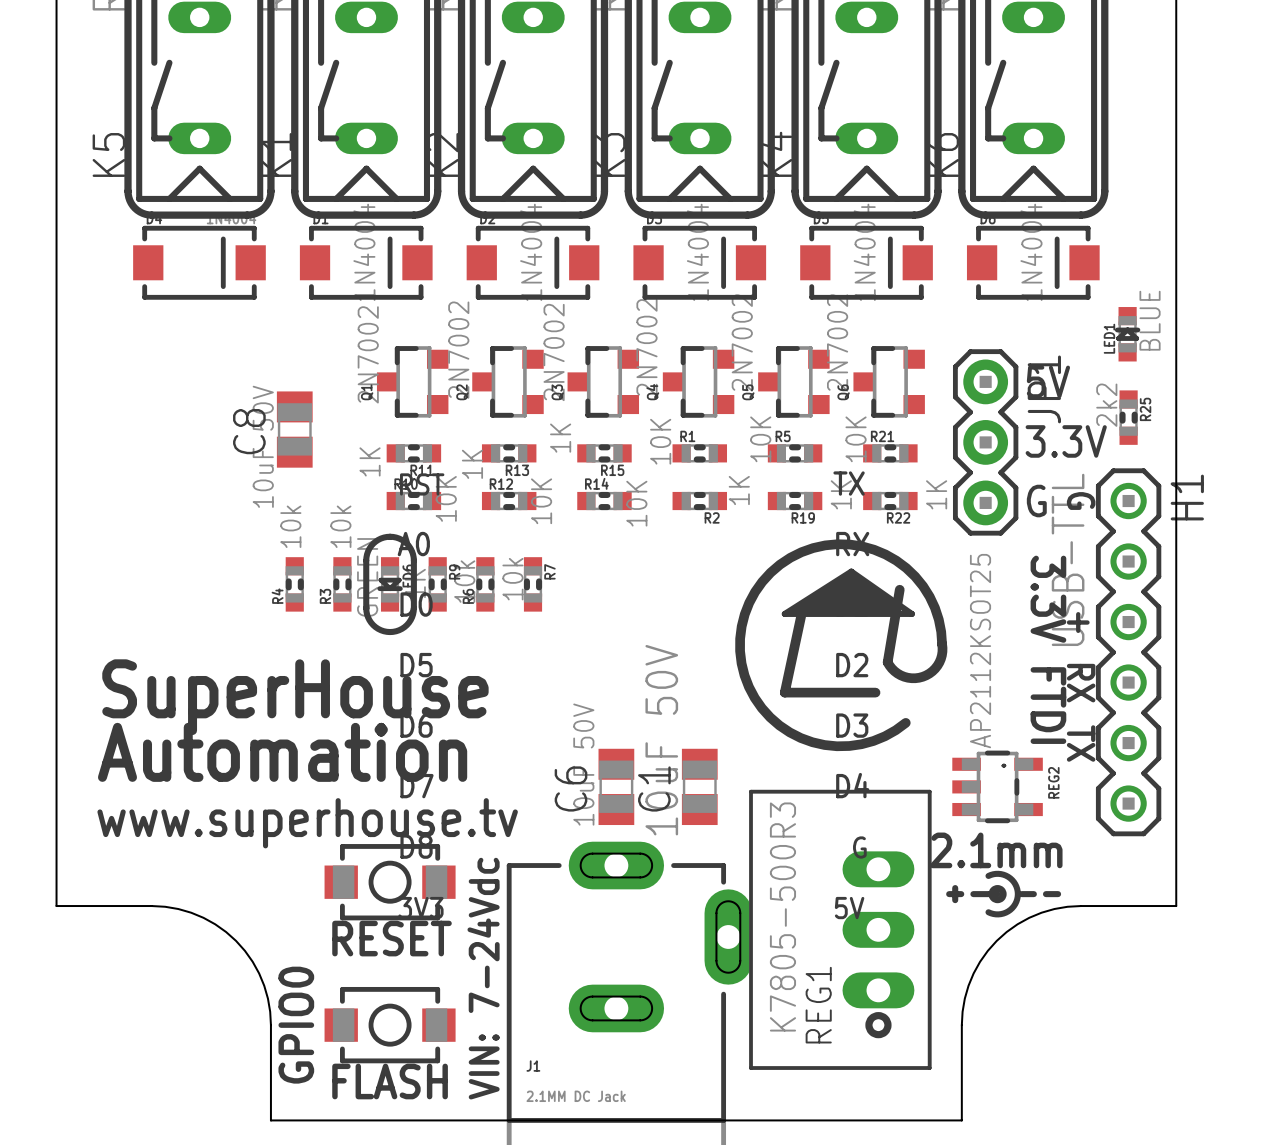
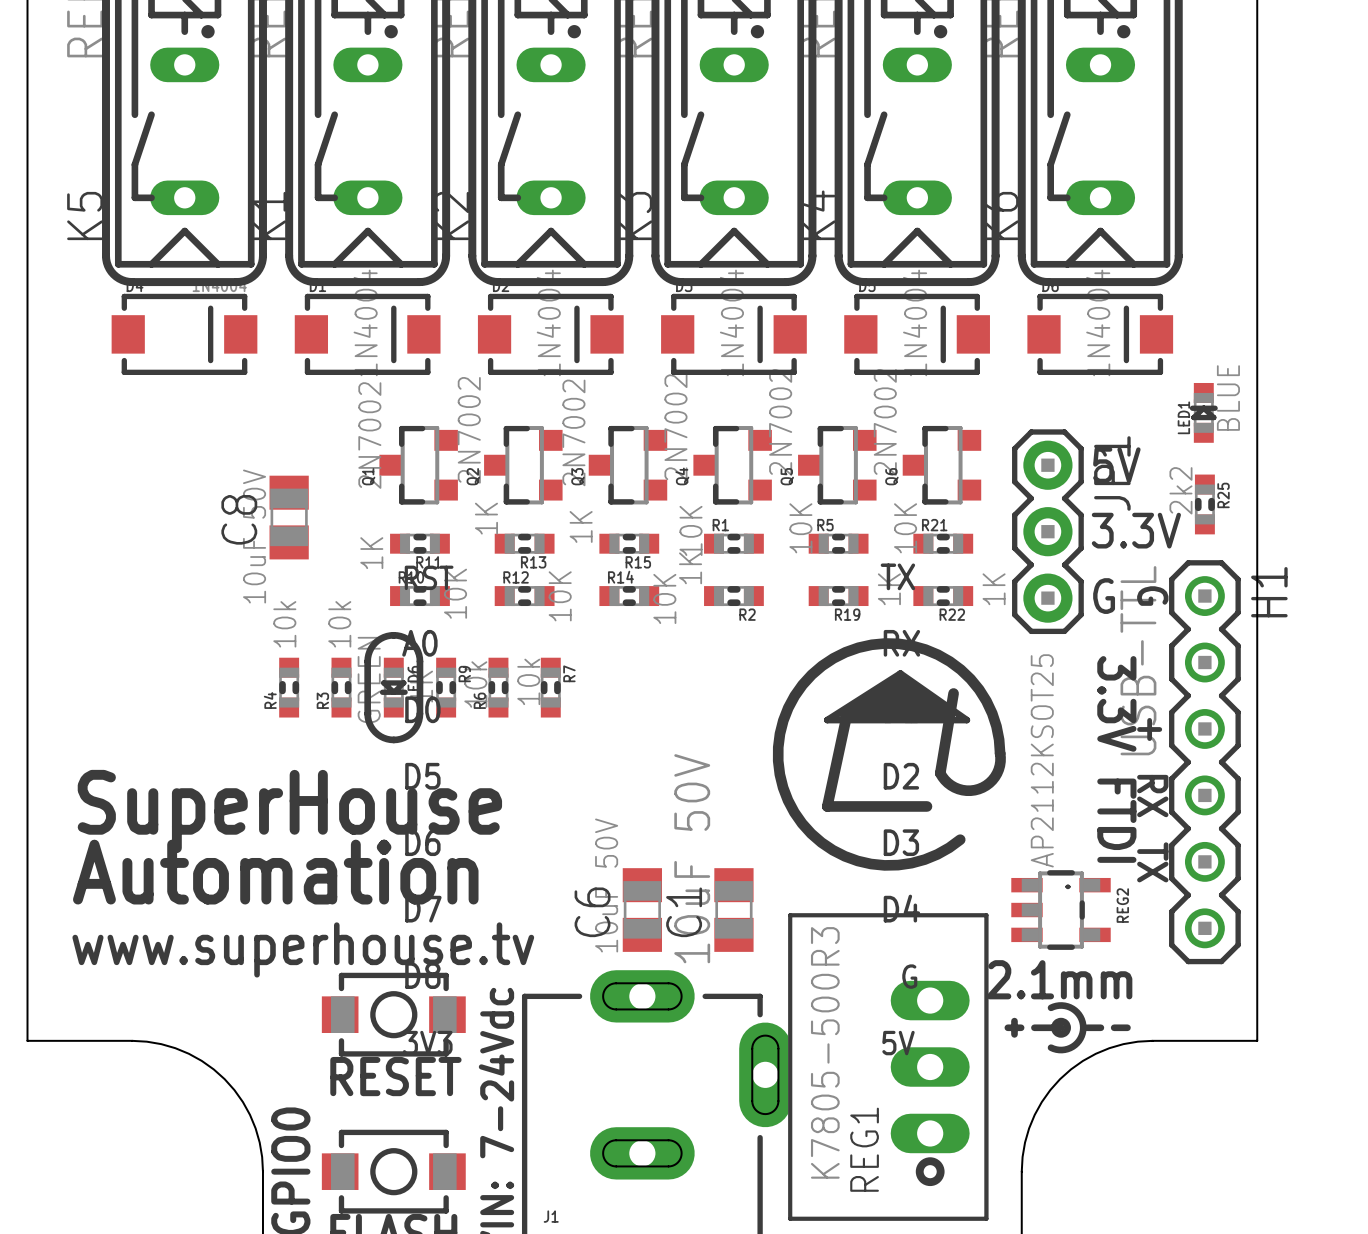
R13 value position: 1K (472, 464) -> 1K (486, 518)
R2 value position: 1K (739, 490) -> 1K (690, 568)

